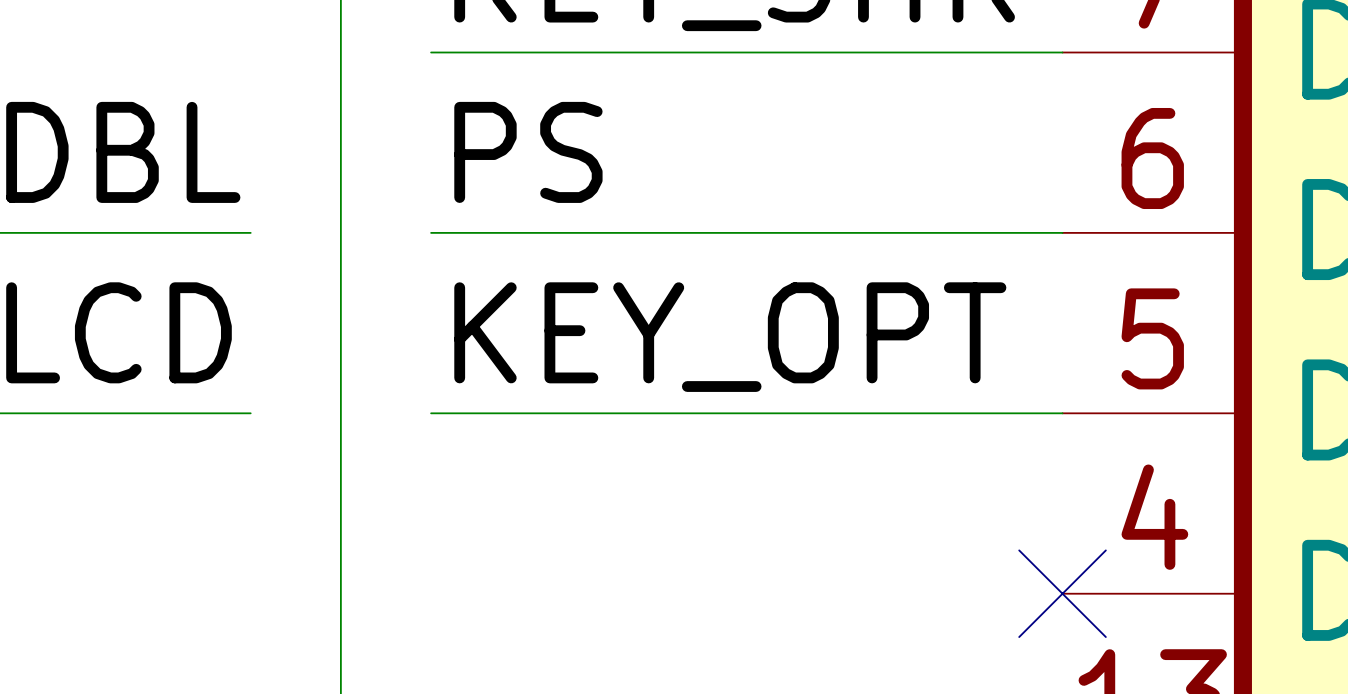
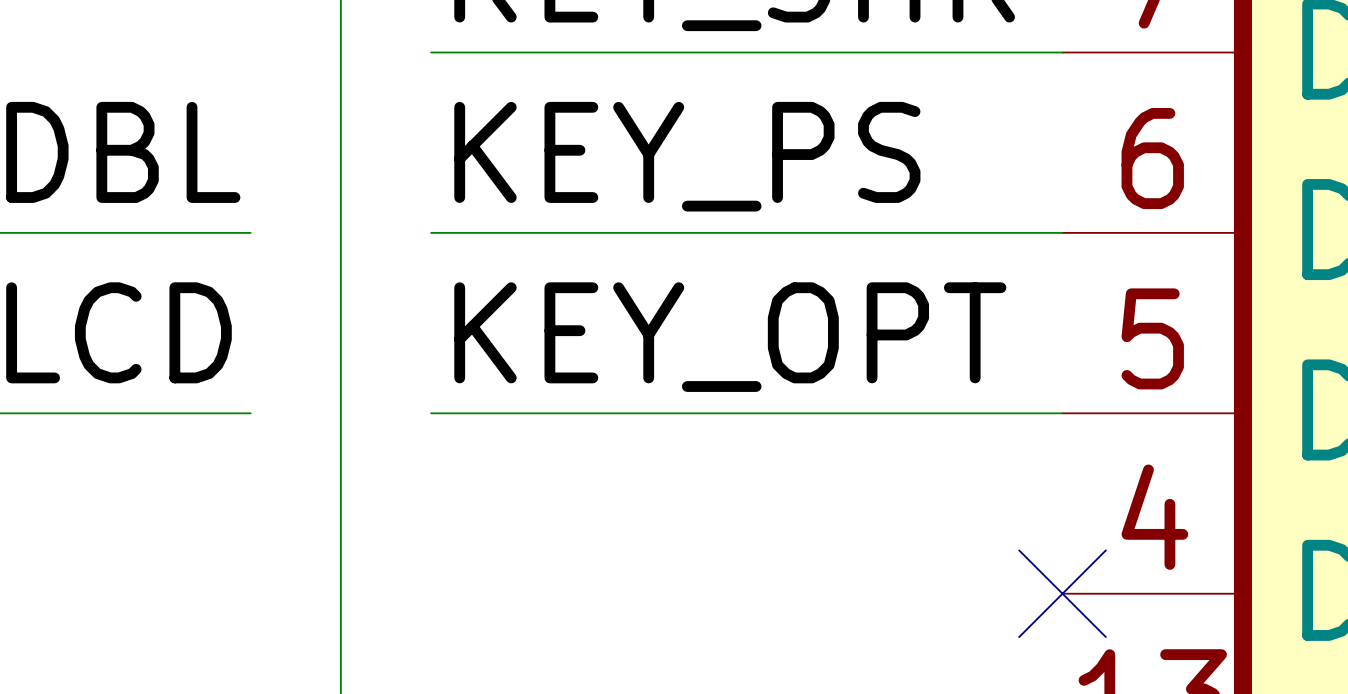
label: PS (528, 152) -> KEY_PS (687, 156)

